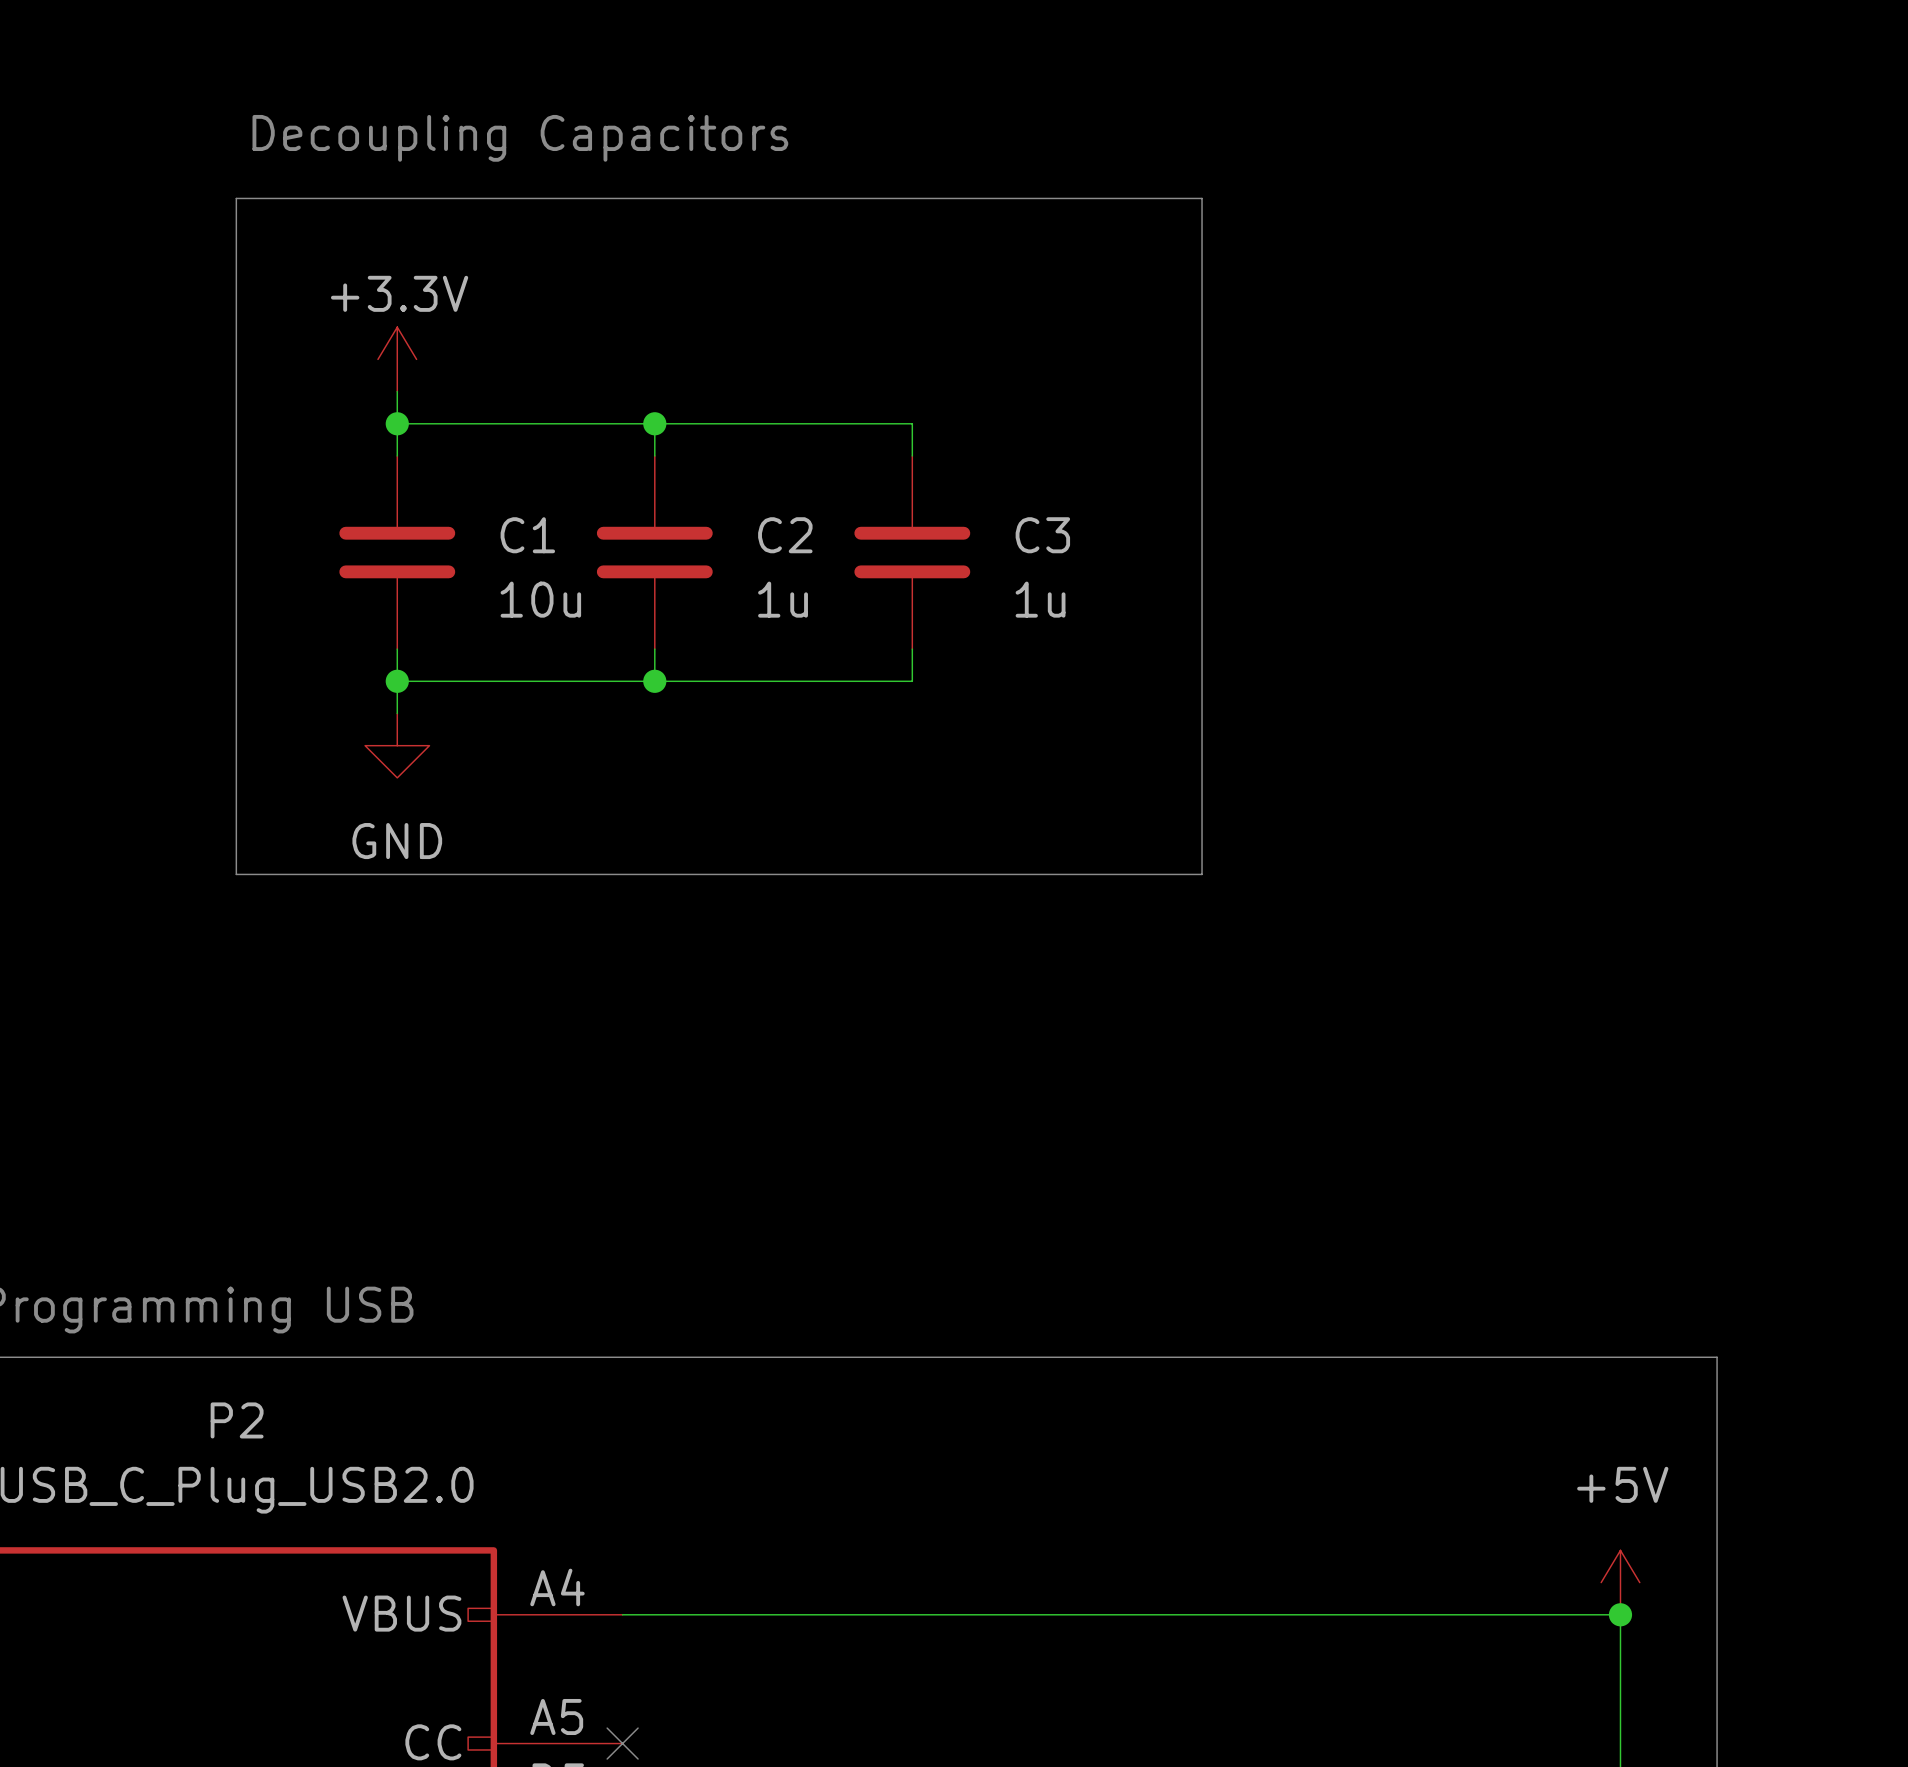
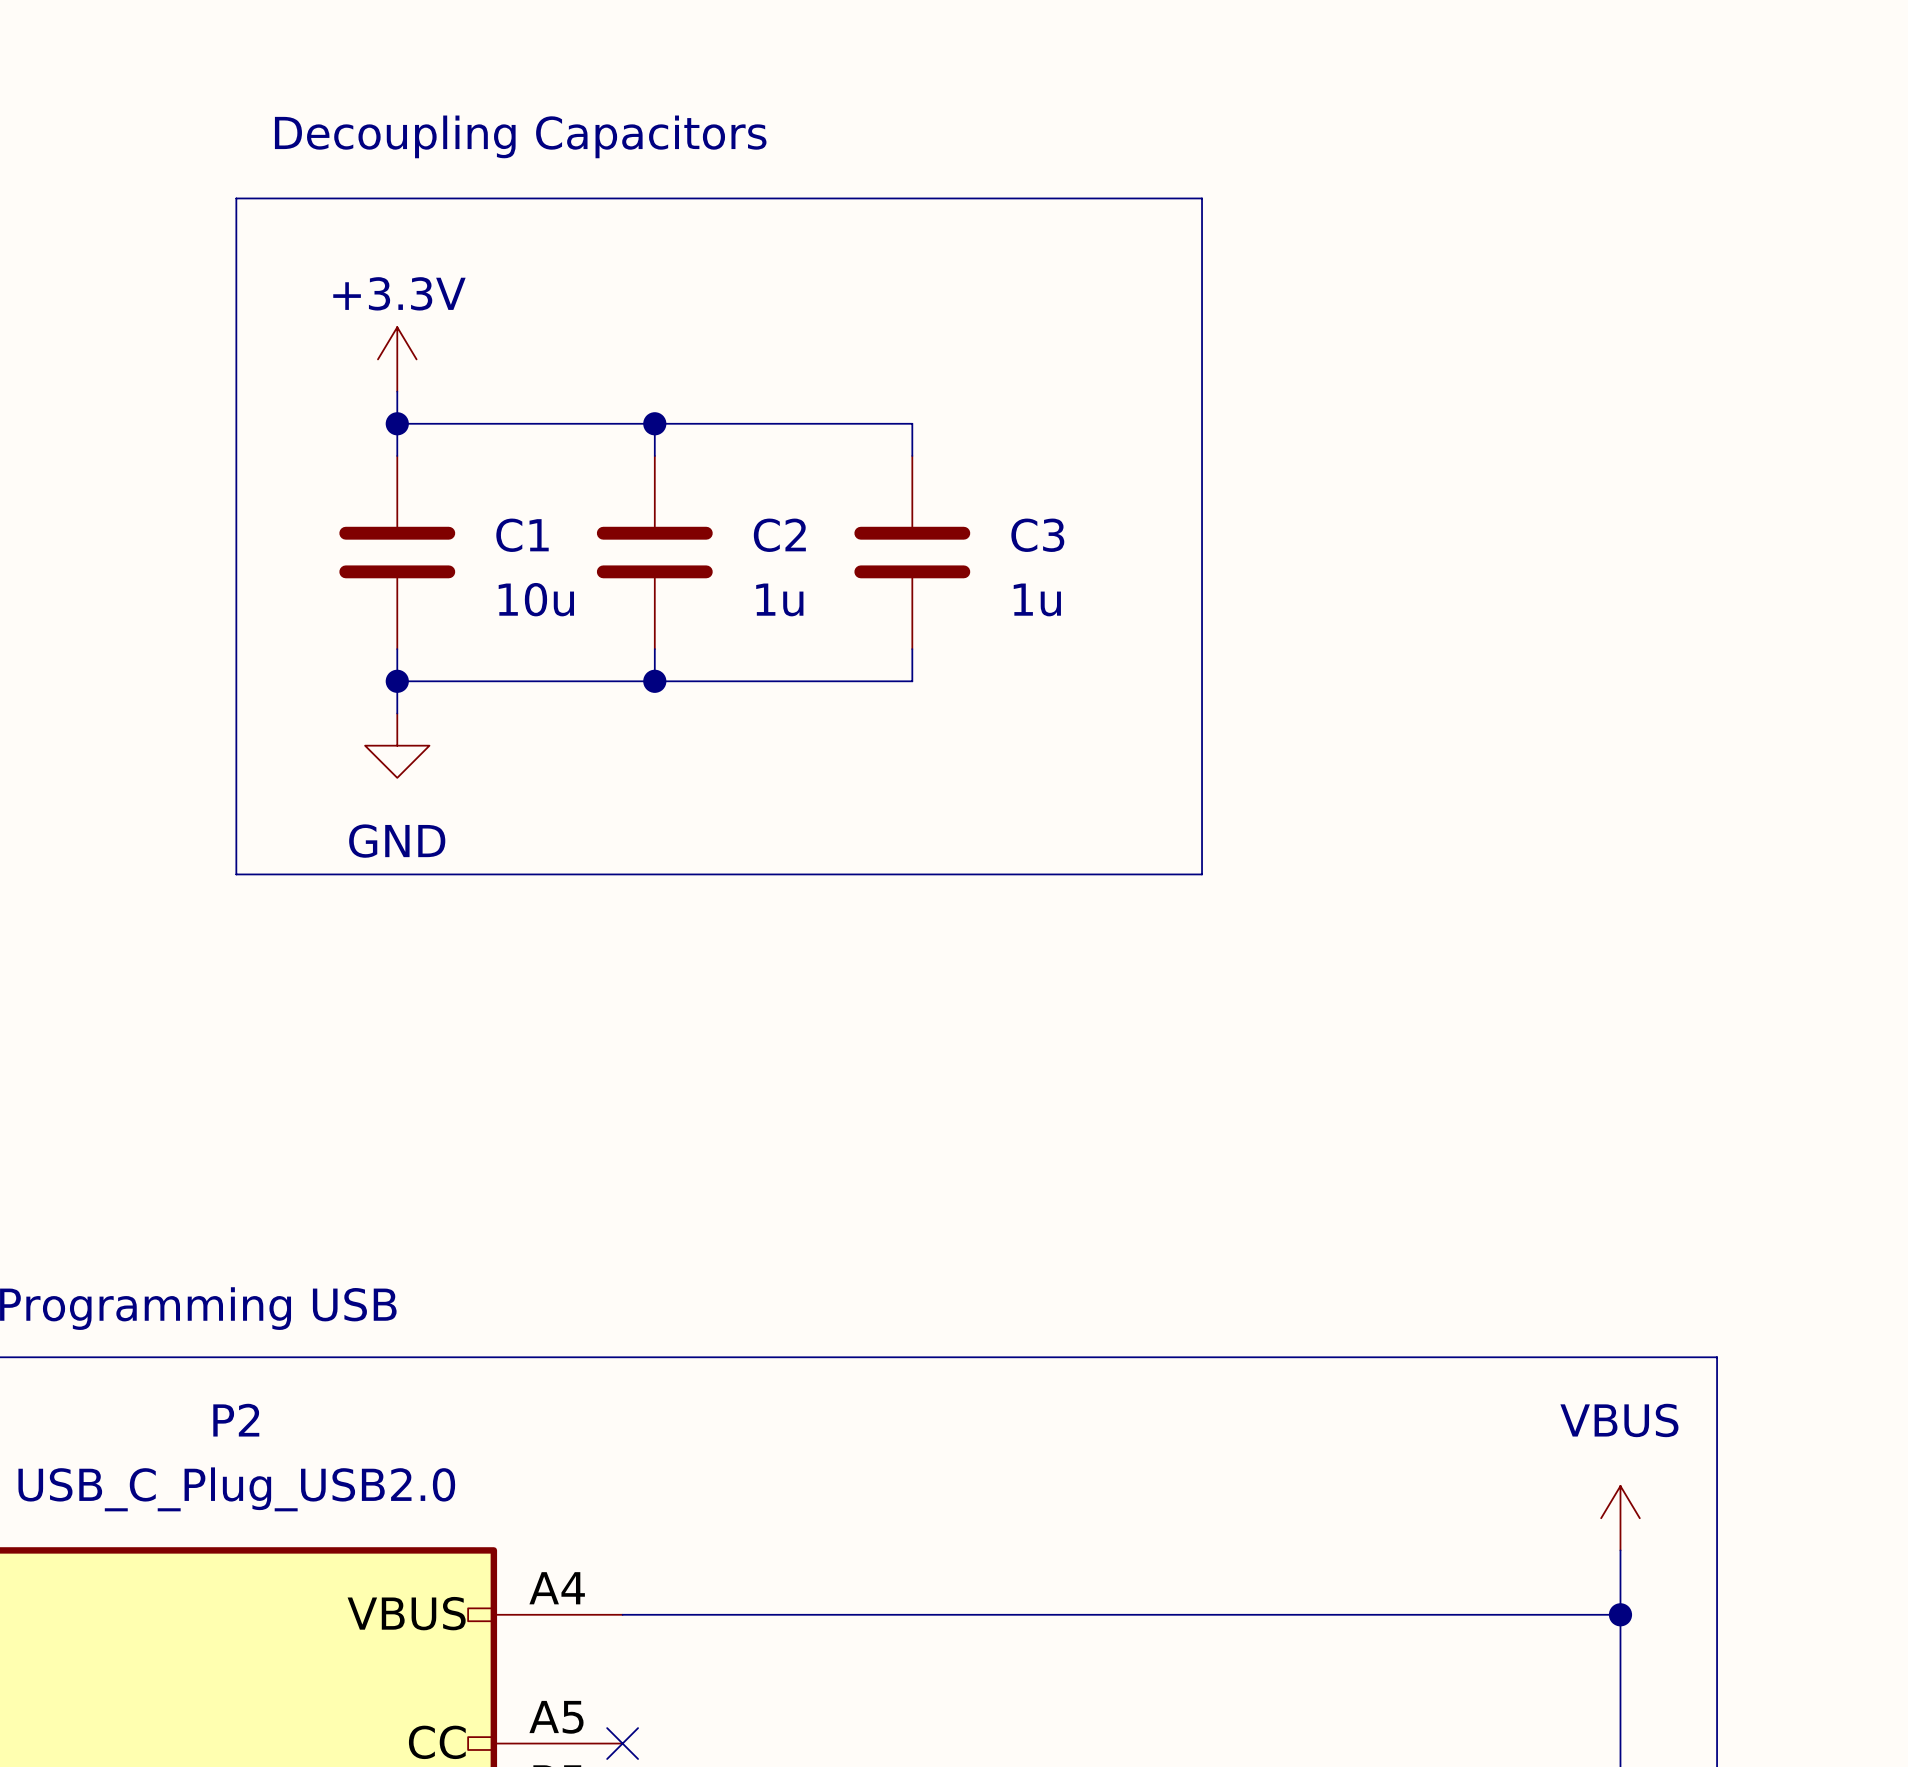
power symbol: none -> VBUS (1620, 1518)
power symbol: +5V (1620, 1582) -> none

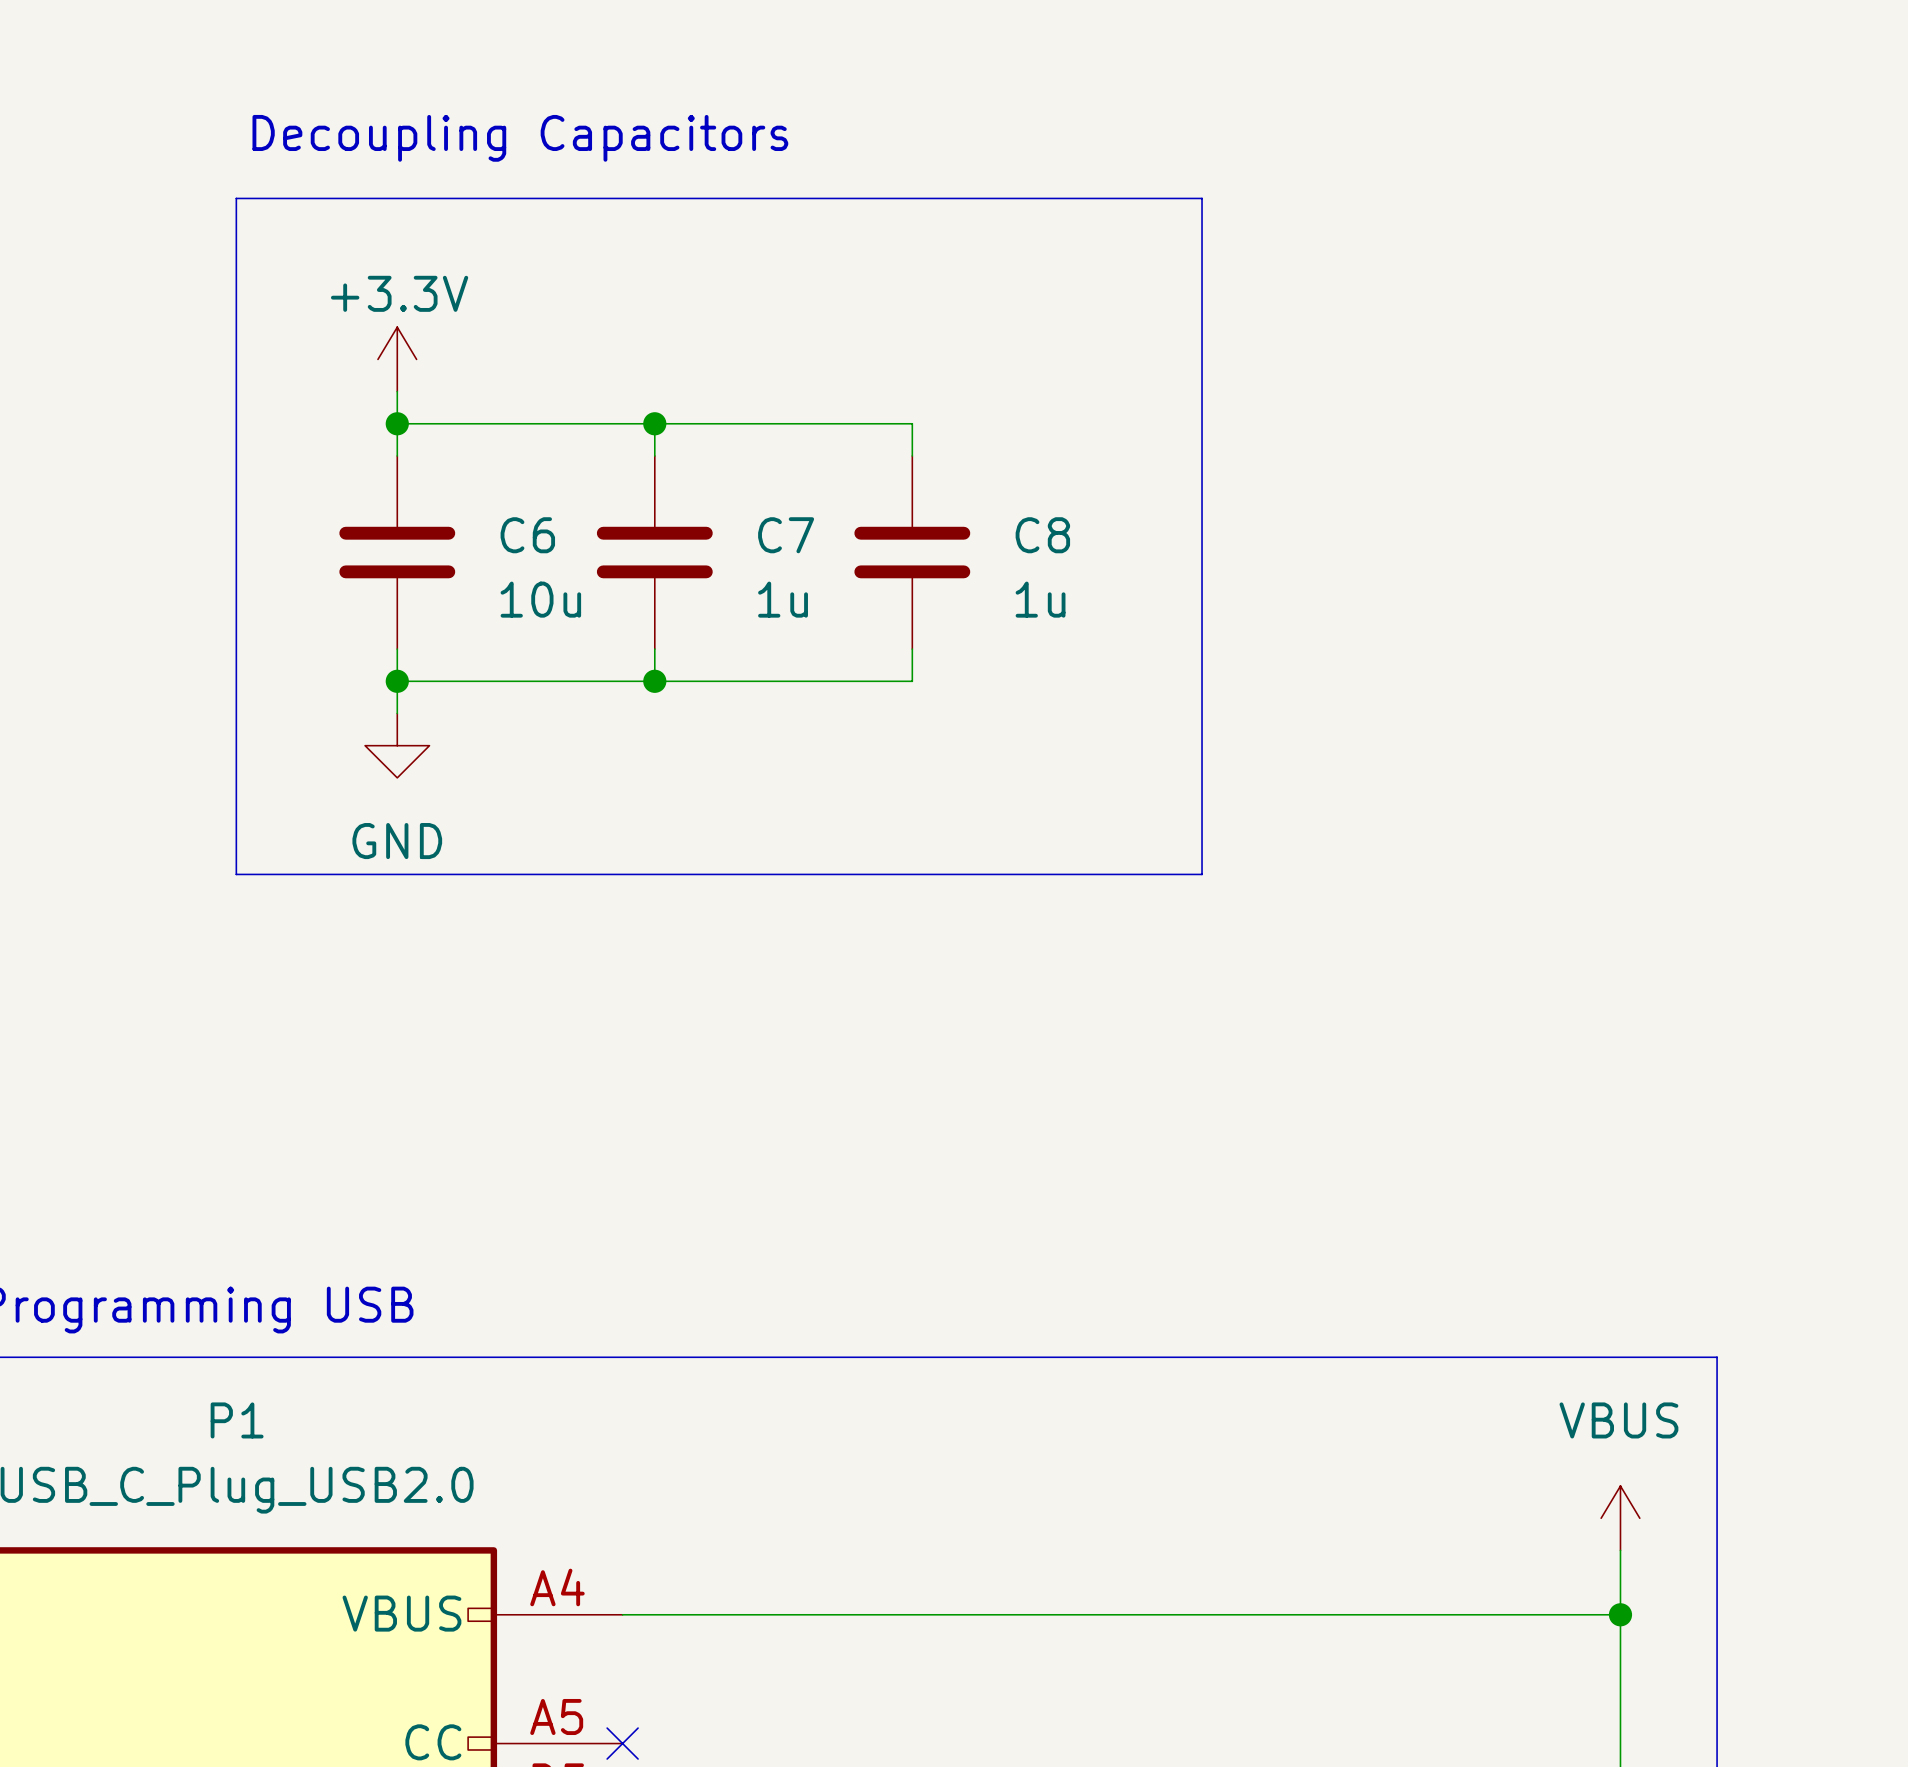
C1 name: C1 (522, 535) -> C6 (527, 535)
C2 name: C2 (779, 535) -> C7 (786, 535)
C3 name: C3 (1037, 535) -> C8 (1042, 535)
P2 name: P2 (236, 1420) -> P1 (237, 1420)

